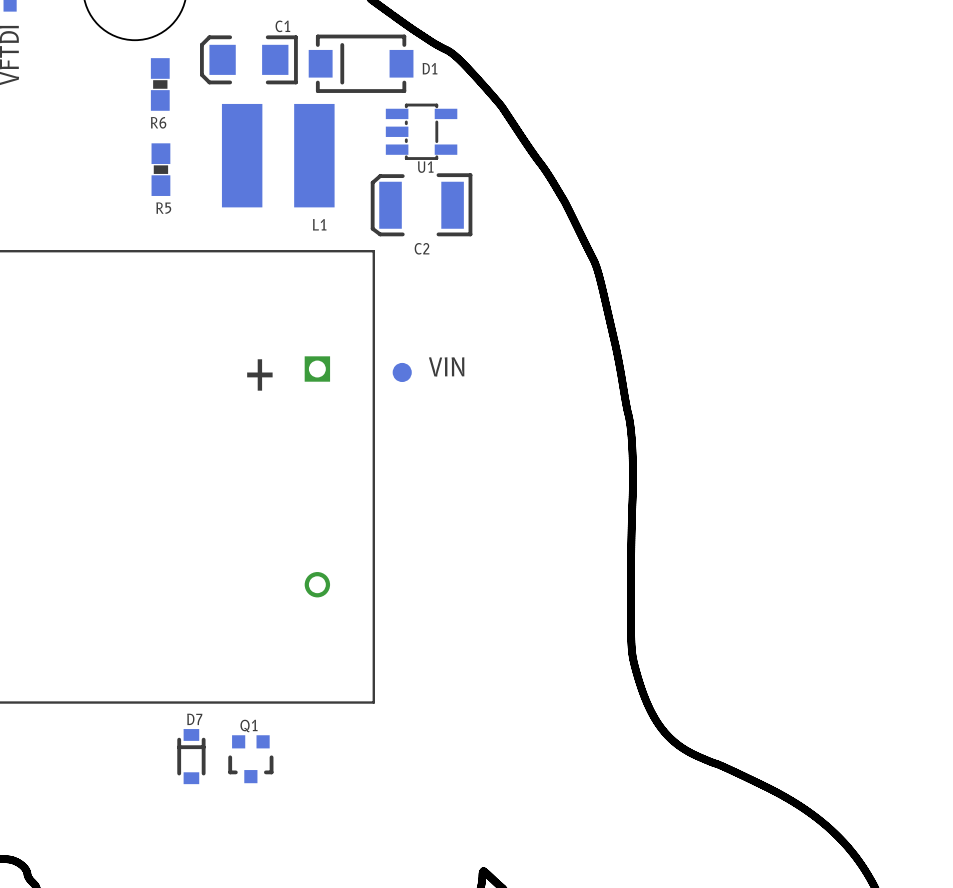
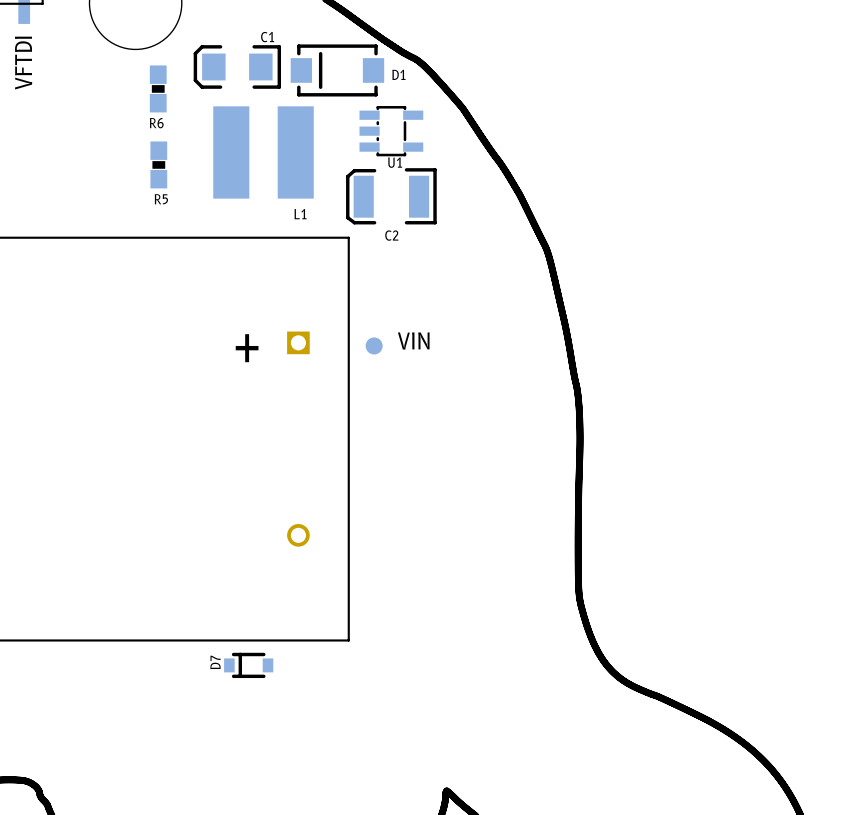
D7 rotation: 0° (191, 756) -> 90° counterclockwise (248, 665)
D7 position: (191, 756) -> (248, 665)
Q1: (250, 759) -> none

